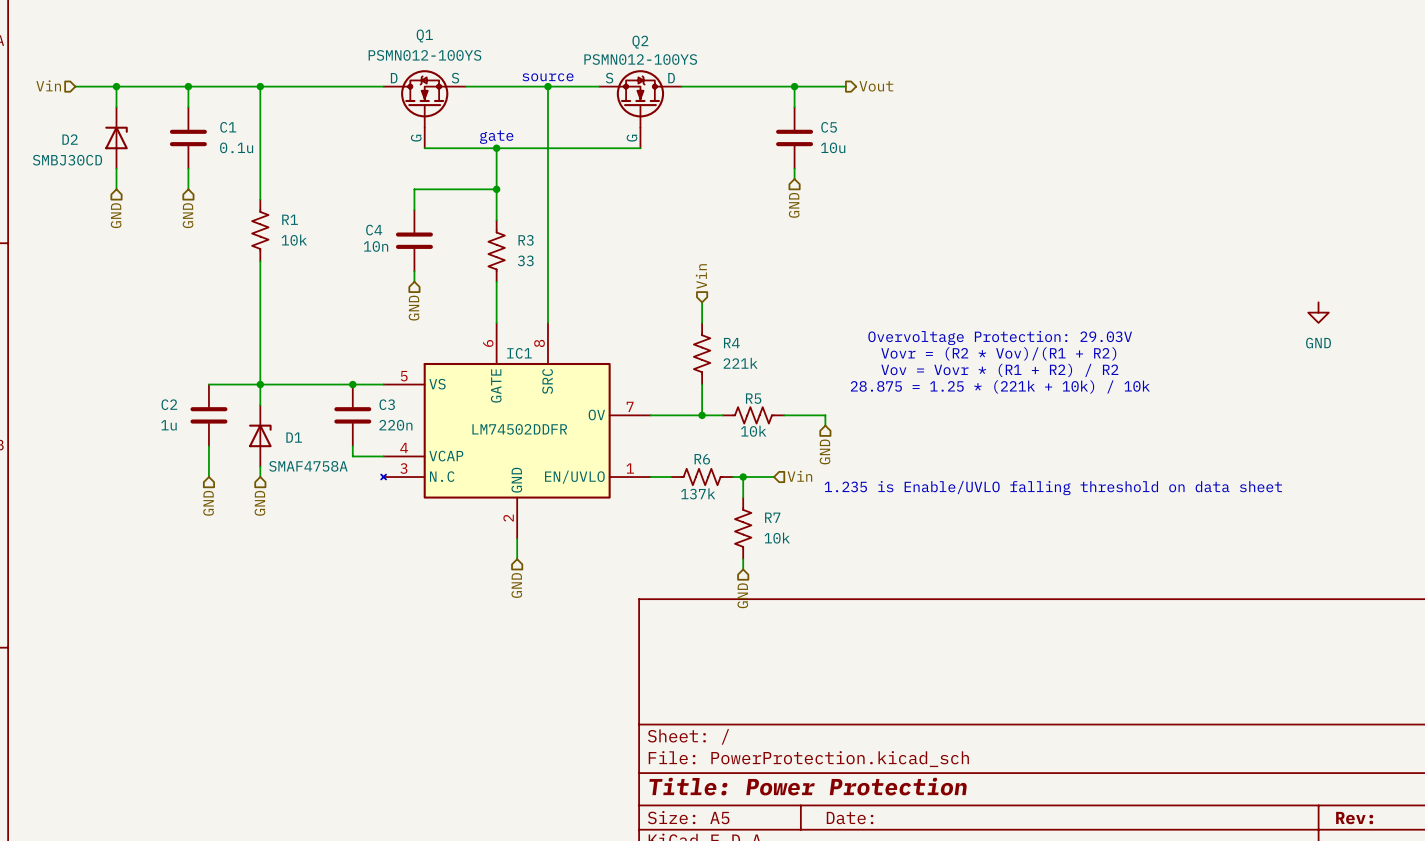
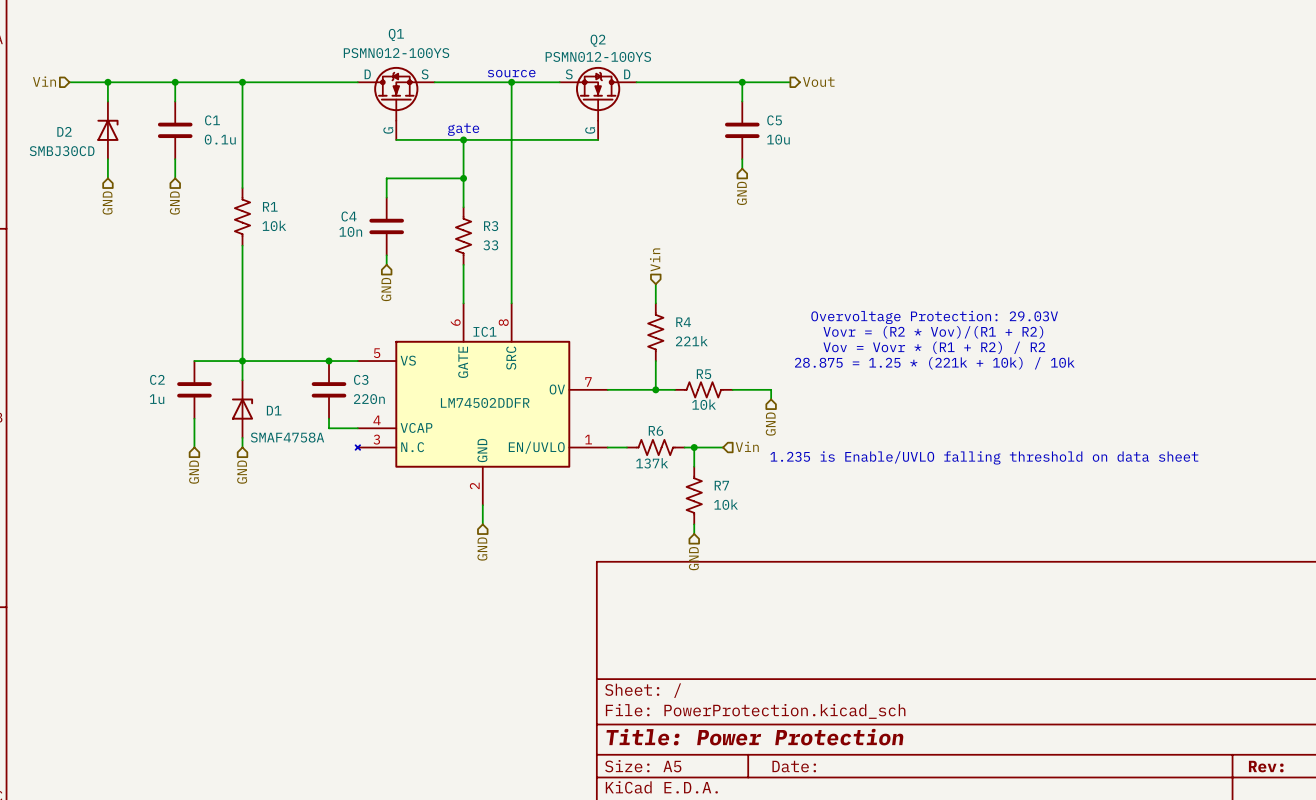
power symbol: GND (1318, 312) -> none

